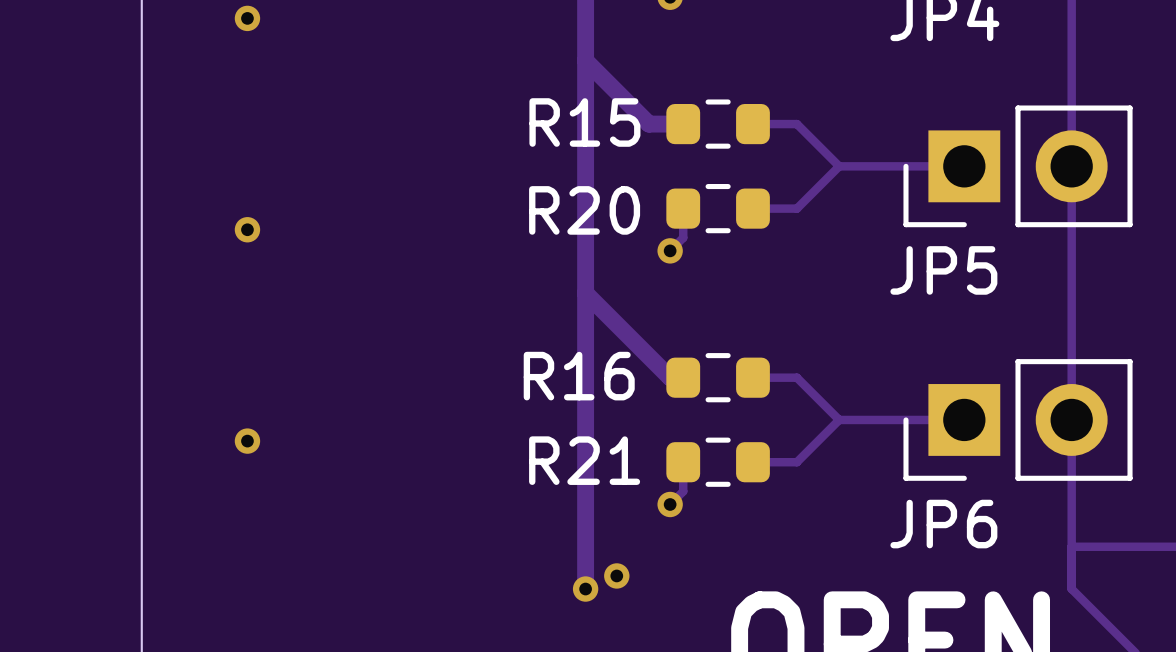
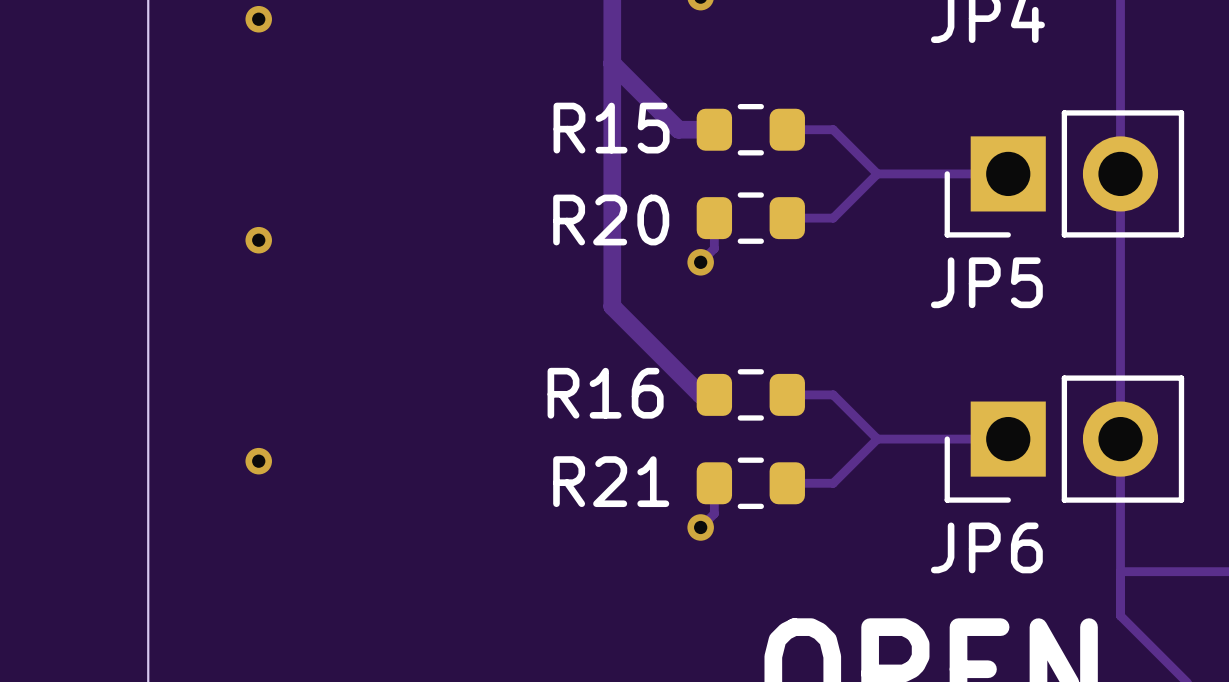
track: (585, 293) (585, 589) -> none
via: (616, 575) -> none
via: (585, 589) -> none

